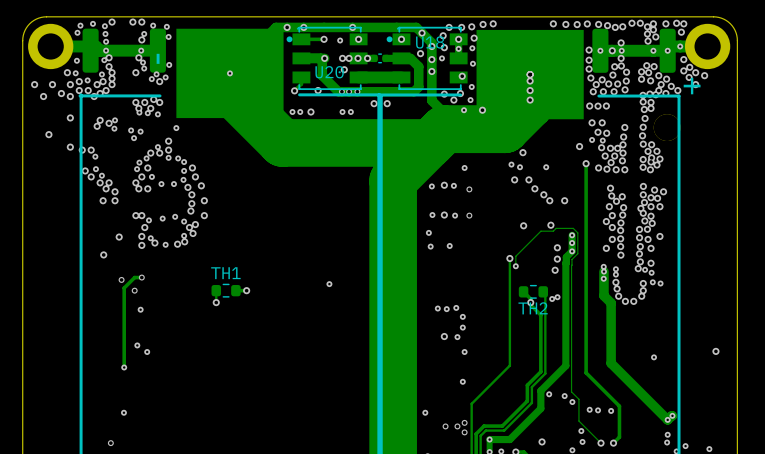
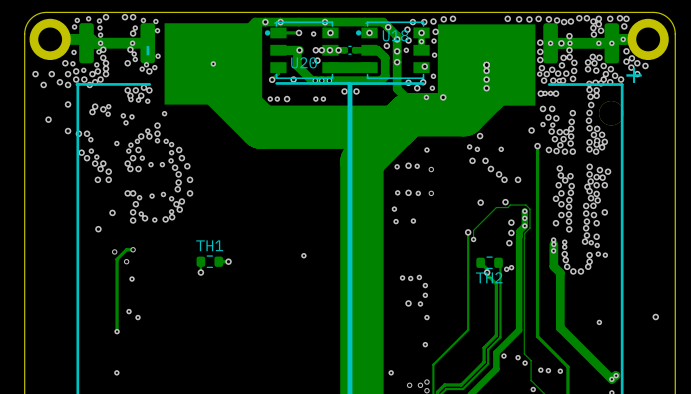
via: none -> (539, 74)
via: none -> (559, 80)
via: none -> (545, 93)
via: none -> (550, 93)
via: (598, 106) -> none
via: none -> (116, 143)

